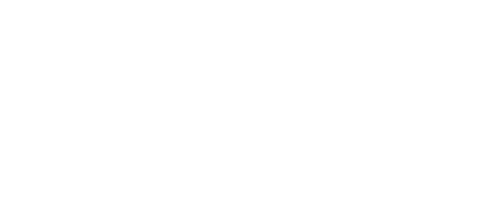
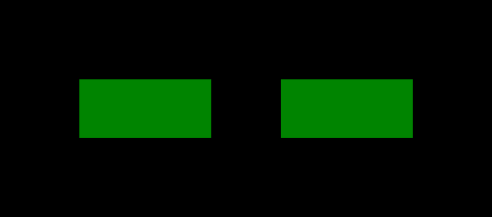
part: none -> (246, 108)

